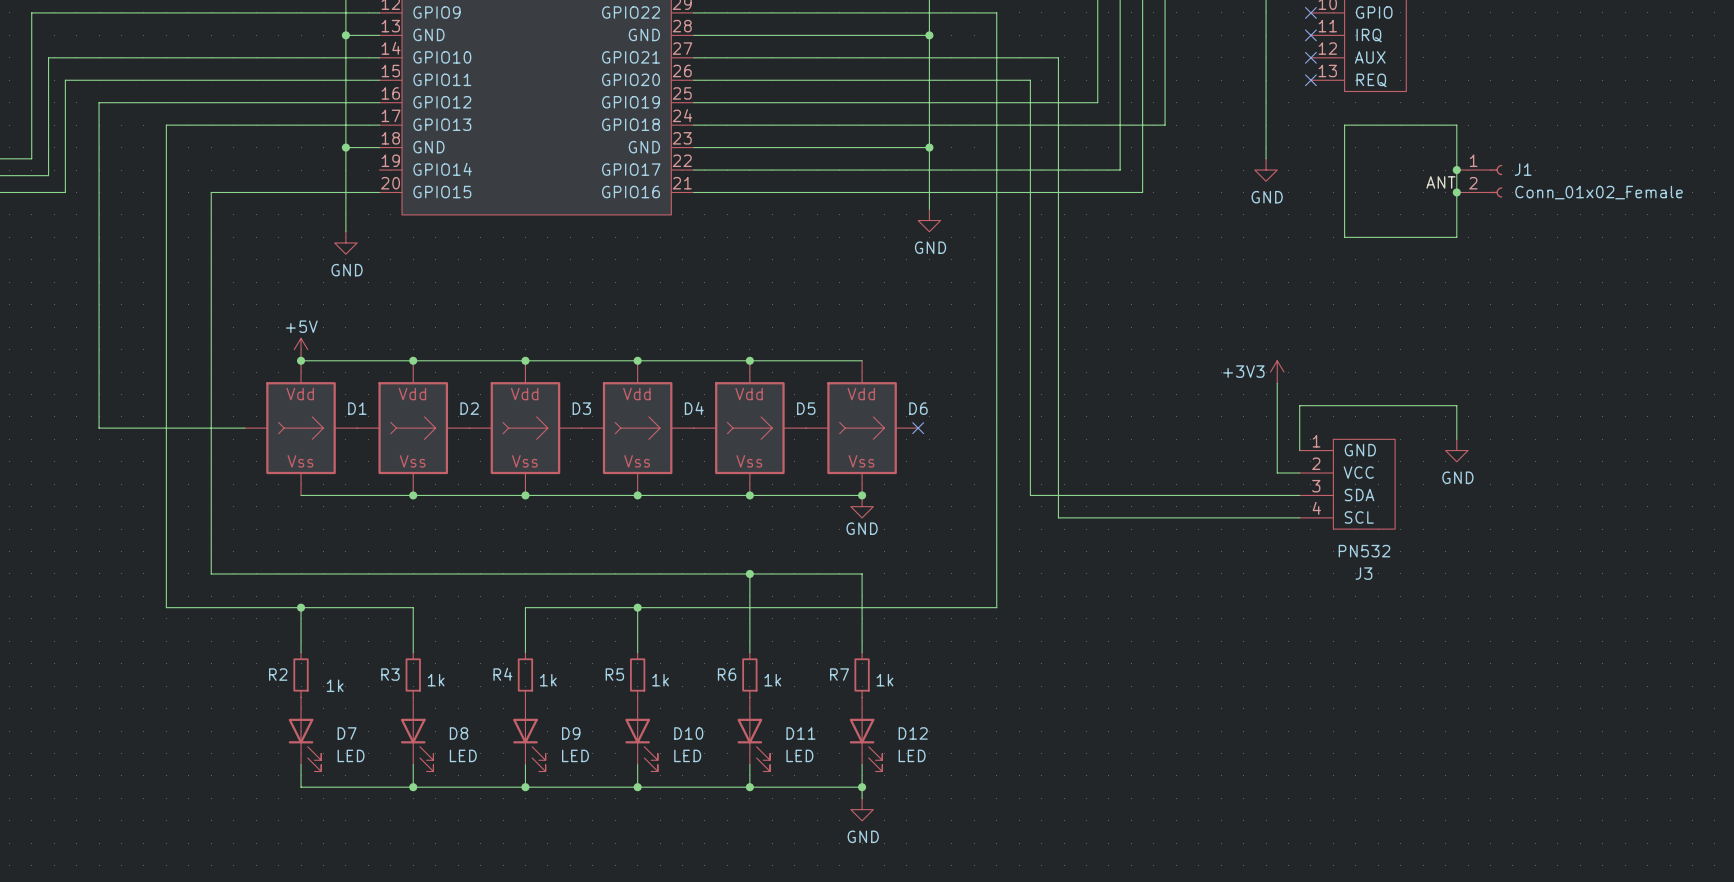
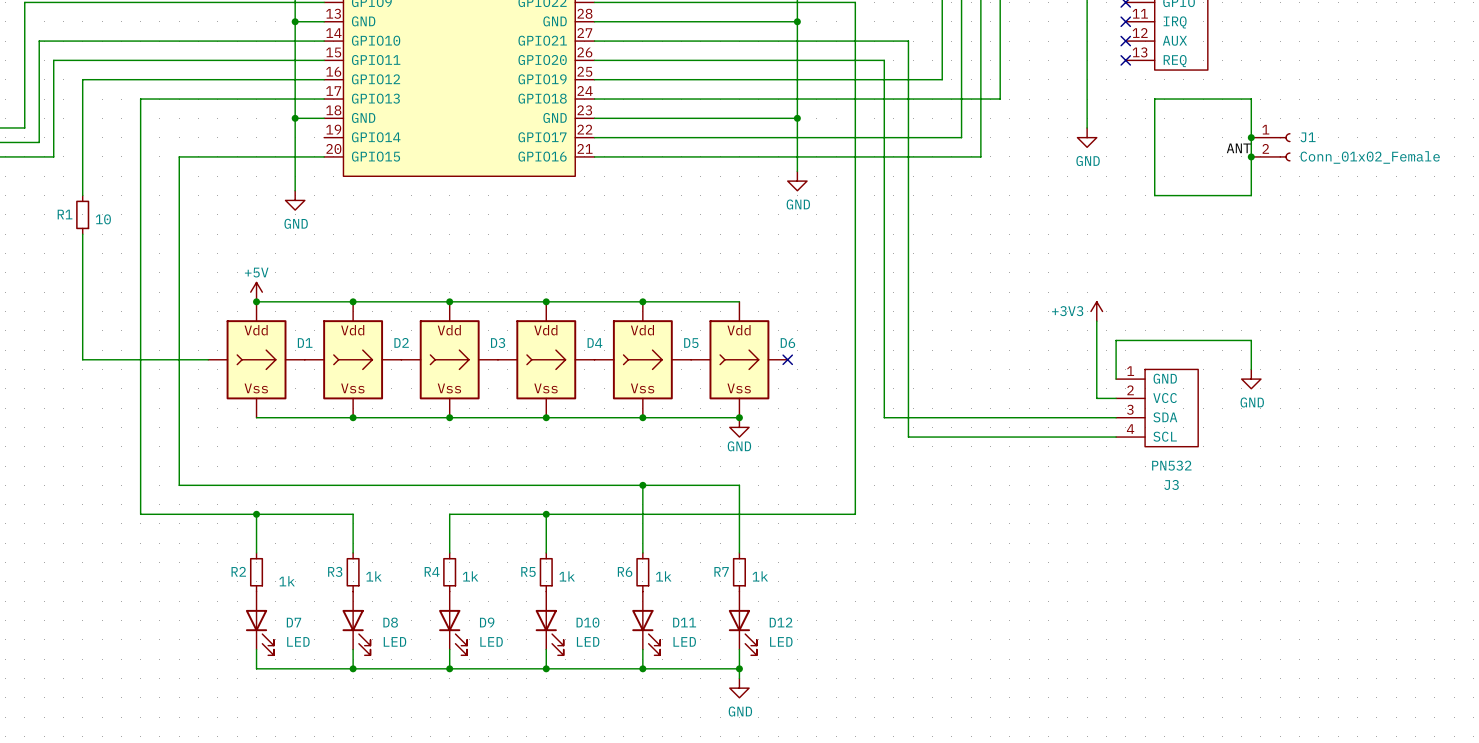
wire: (99, 237) (99, 282) -> none
R1: none -> 10 (82, 214)

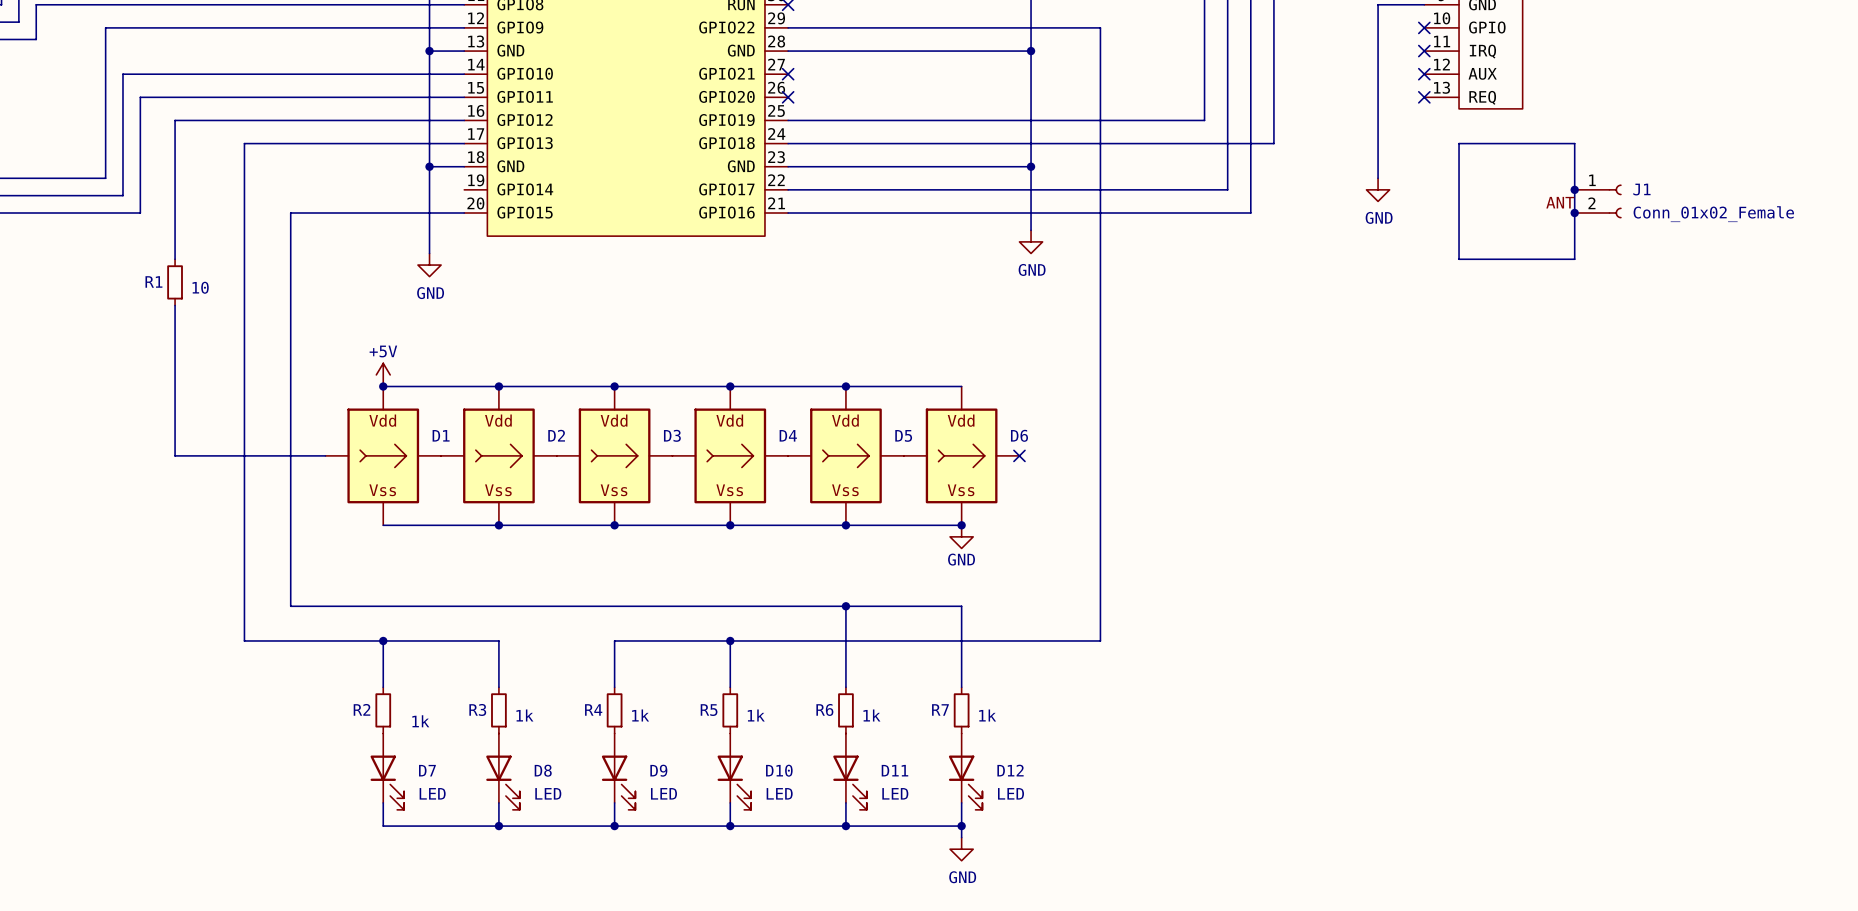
wire: (594, 41) (908, 41) (908, 437) (1116, 437) -> none
no-connect mark: none -> (788, 74)
wire: (594, 60) (884, 60) (884, 417) (1116, 417) -> none
no-connect mark: none -> (788, 97)
power symbol: +3V3 (1096, 311) -> none
wire: (1096, 321) (1096, 398) (1116, 398) -> none
wire: (1251, 369) (1251, 340) (1116, 340) (1116, 379) -> none
power symbol: GND (1251, 379) -> none
J3: PN532 (1157, 408) -> none

